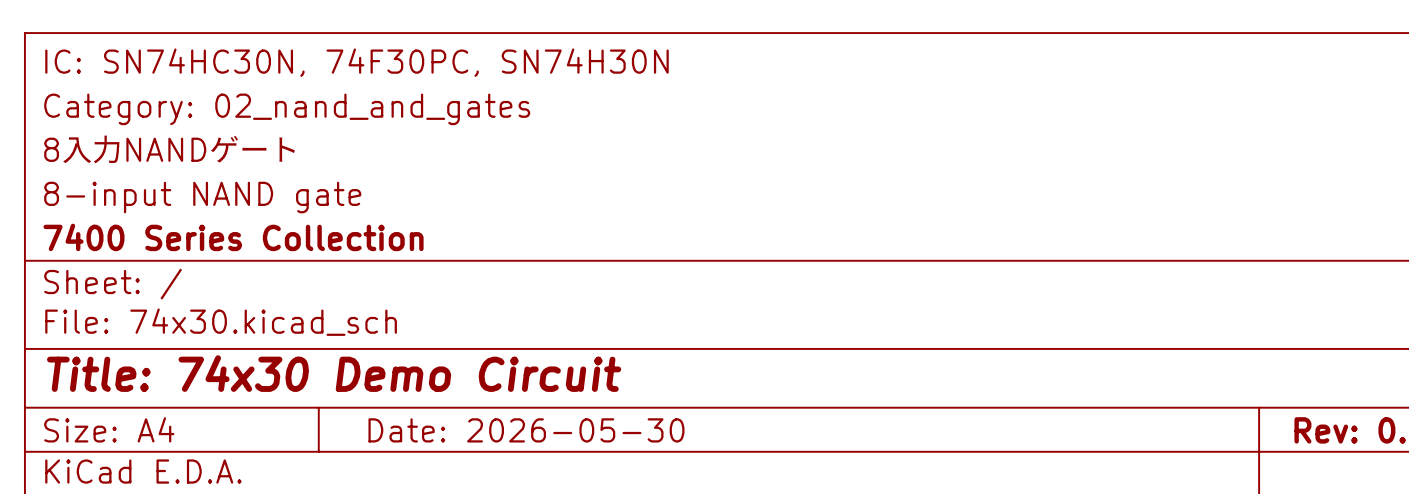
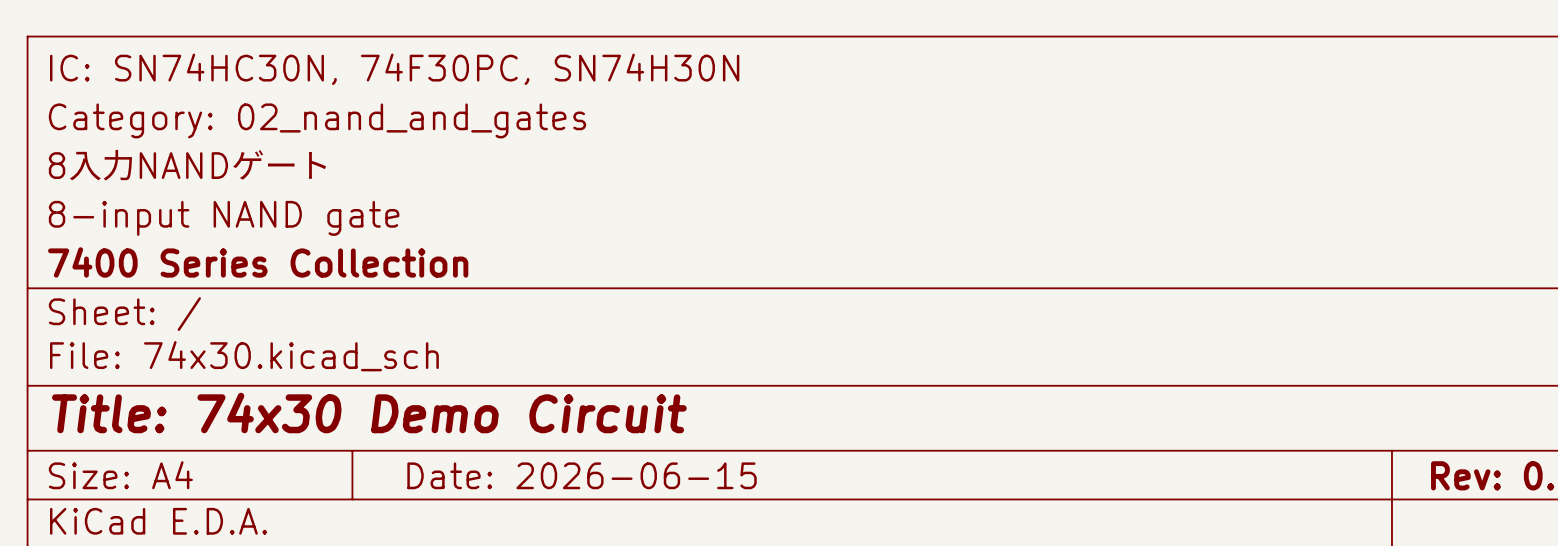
title block: Date: 2026-05-30 (526, 430) -> Date: 2026-06-15 (582, 475)

